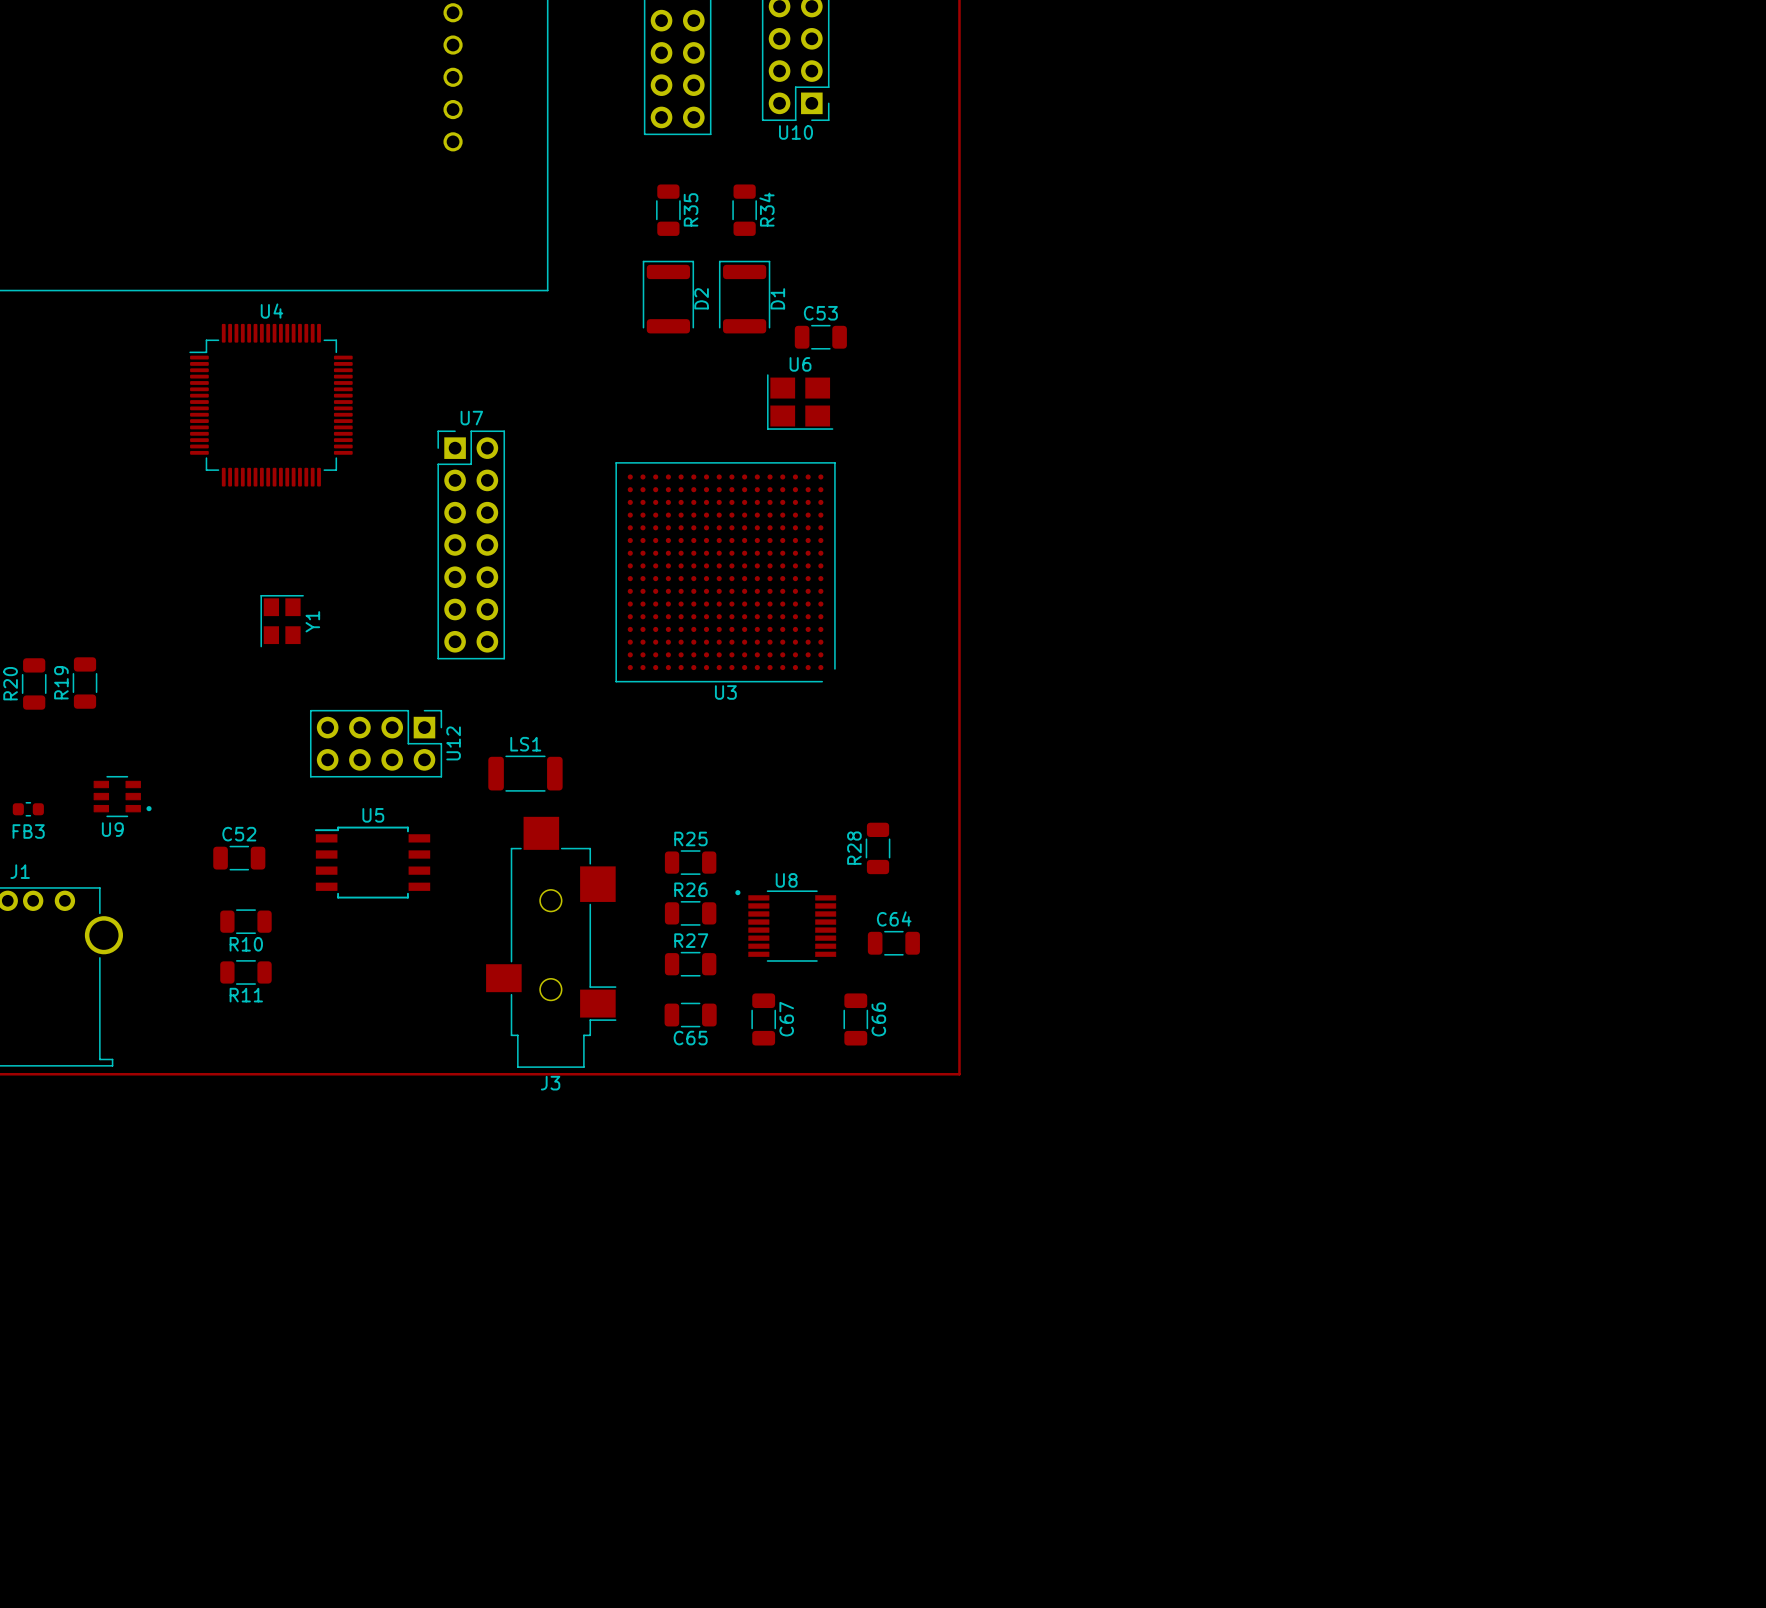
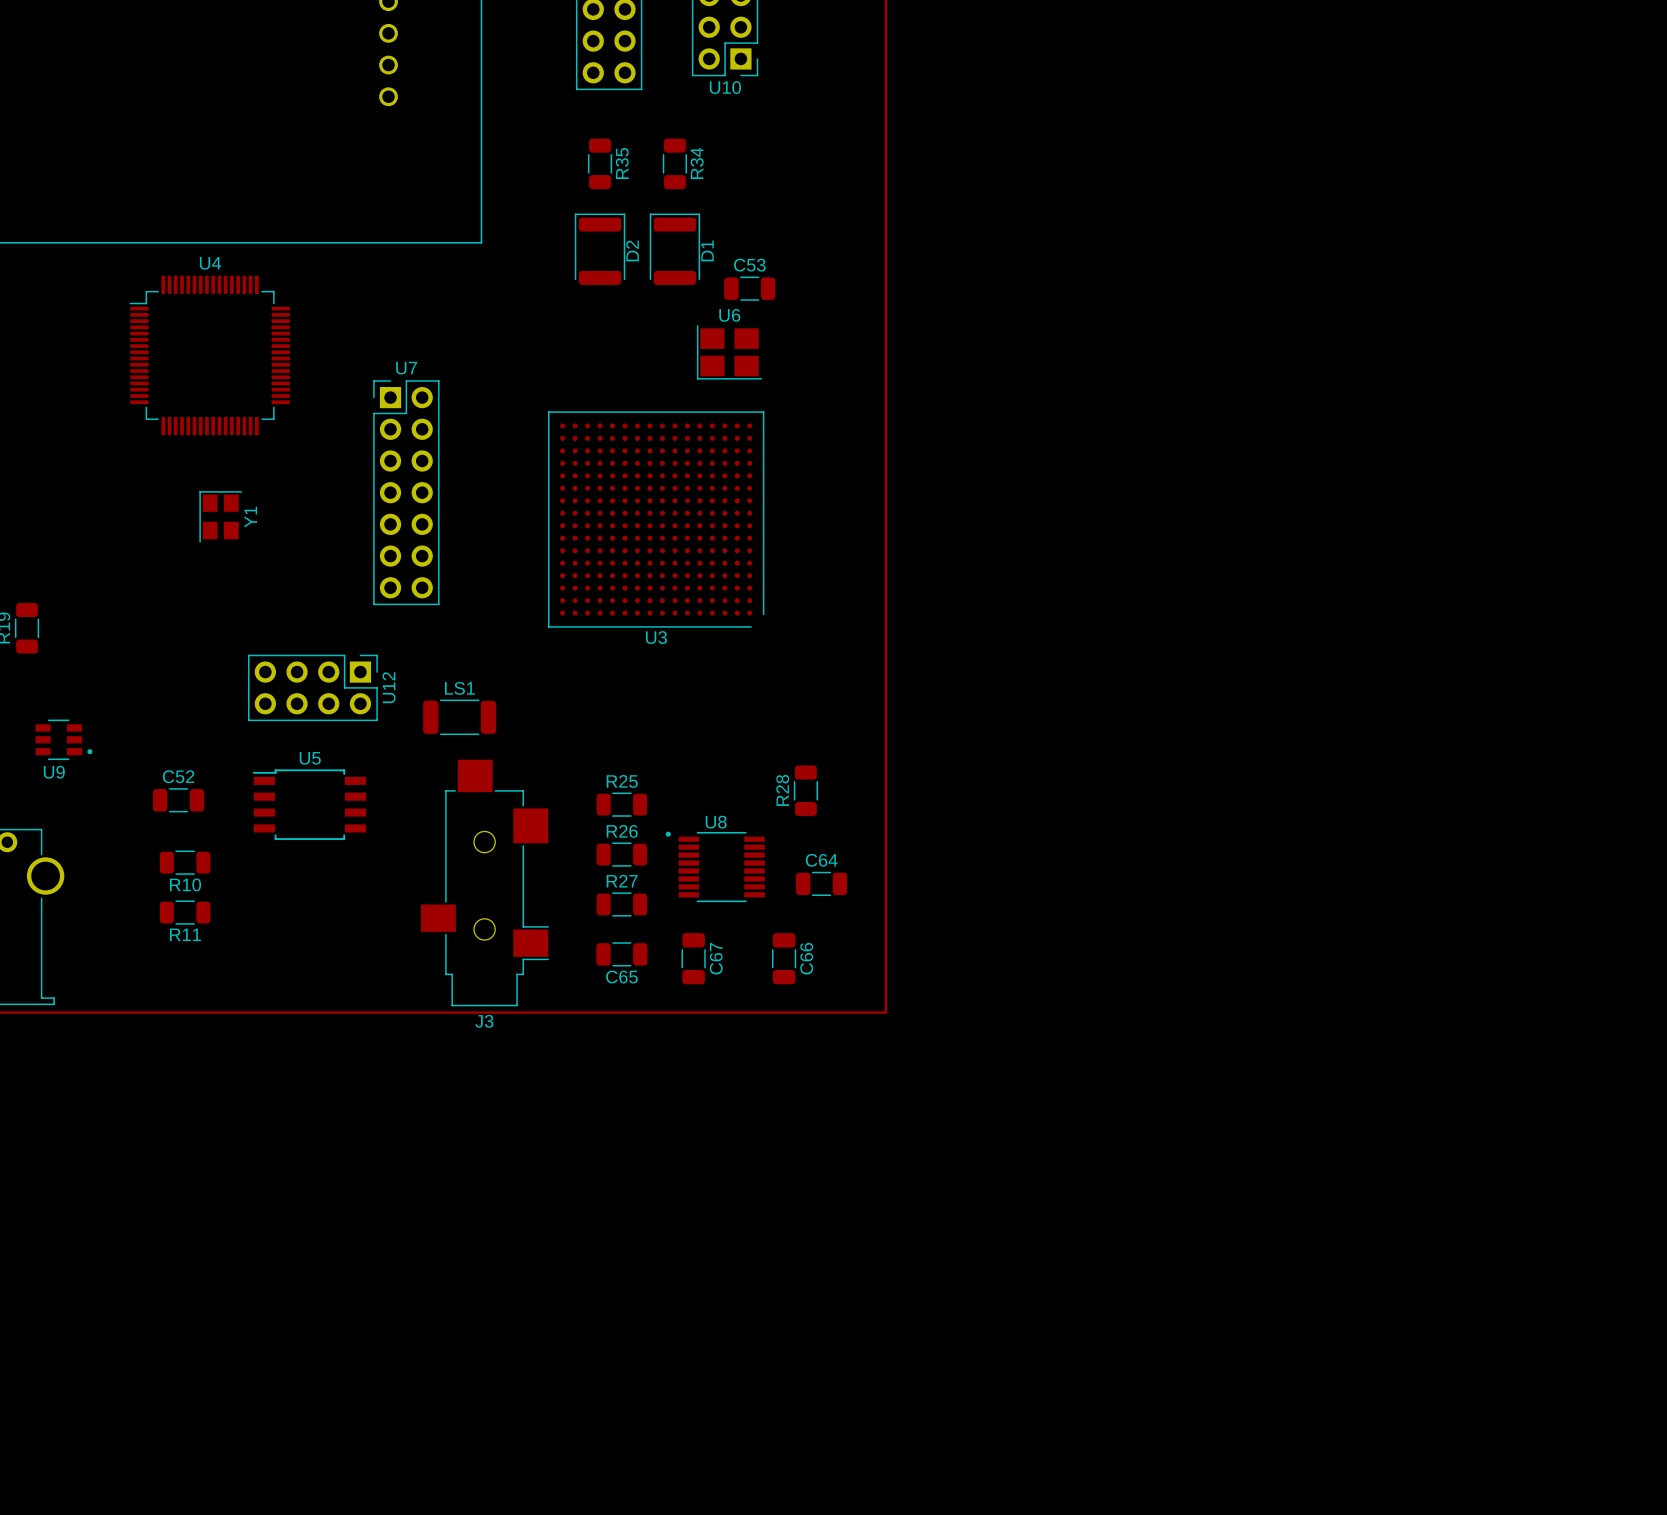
Y1 position: (282, 621) -> (220, 516)

